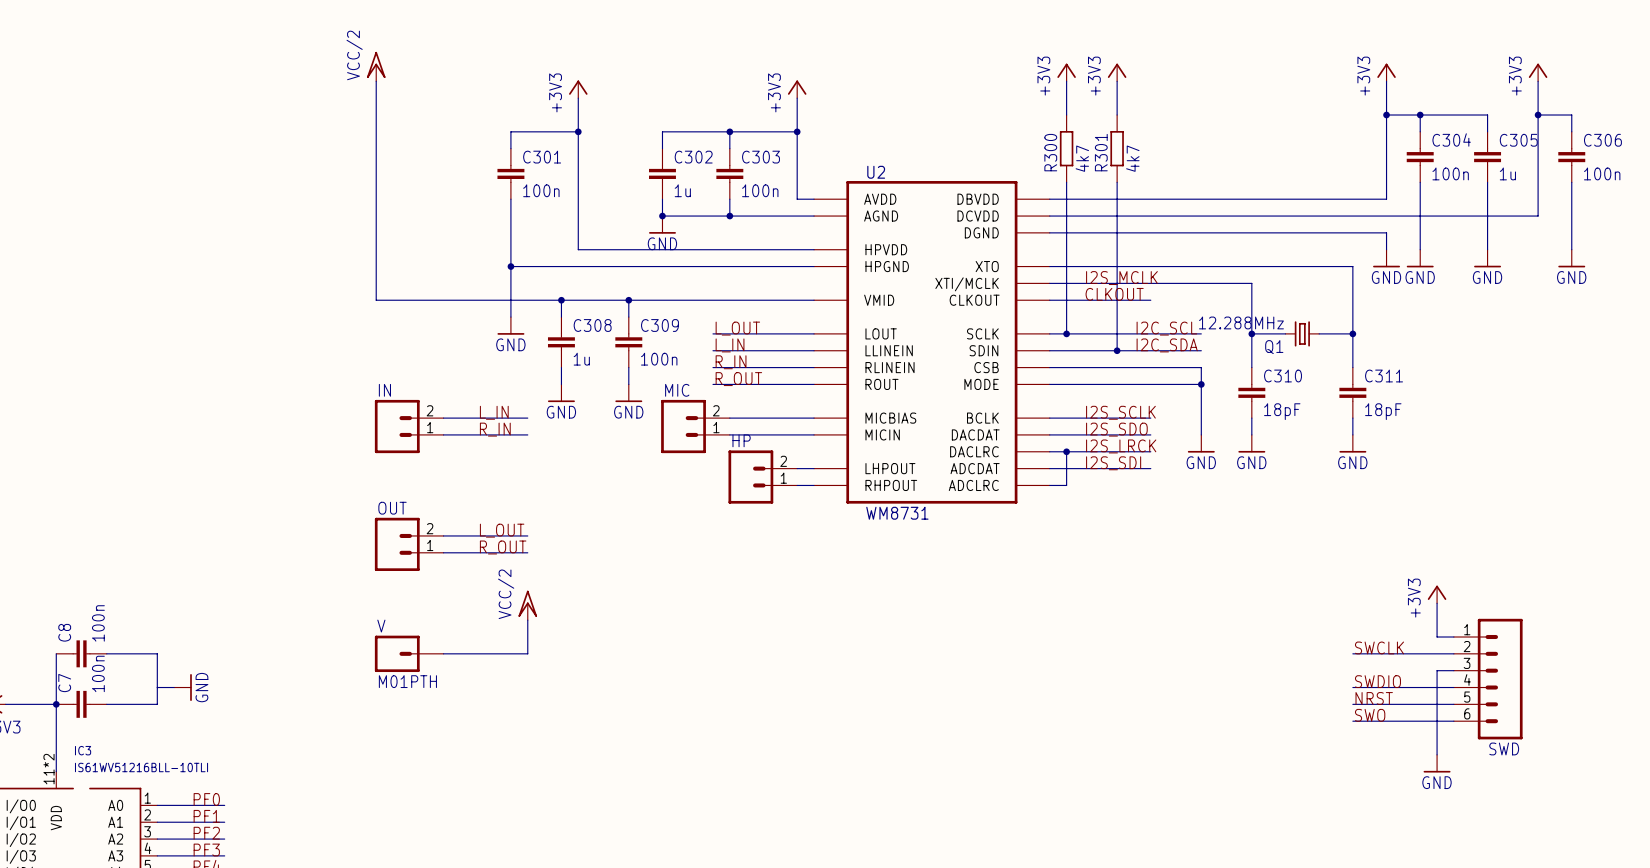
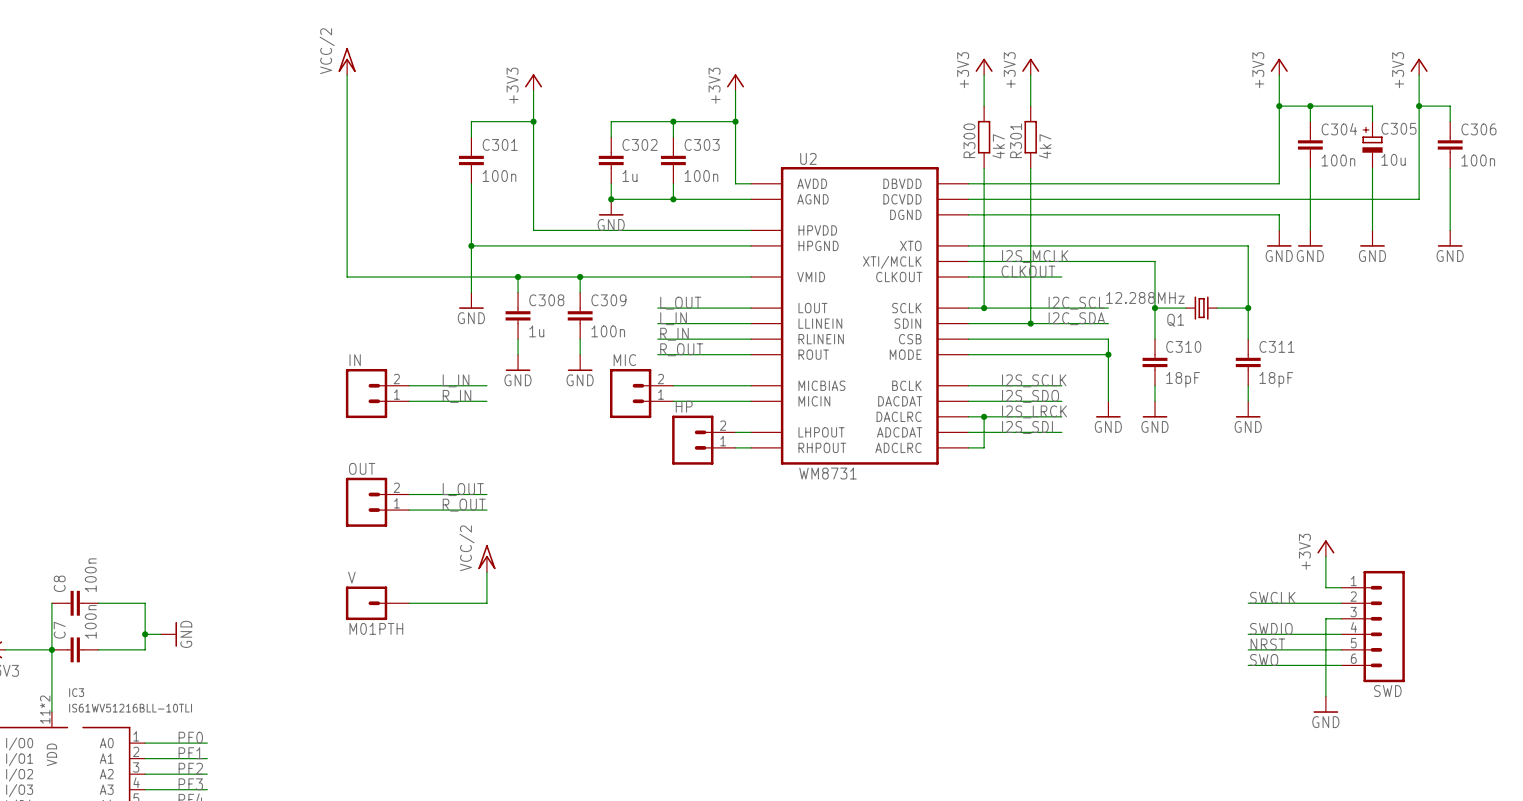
C305 symbol: [1474, 131, 1502, 183] -> [1362, 121, 1383, 169]
C305 value: 1u (1507, 173) -> 10u (1393, 159)
junction: none -> (145, 634)

